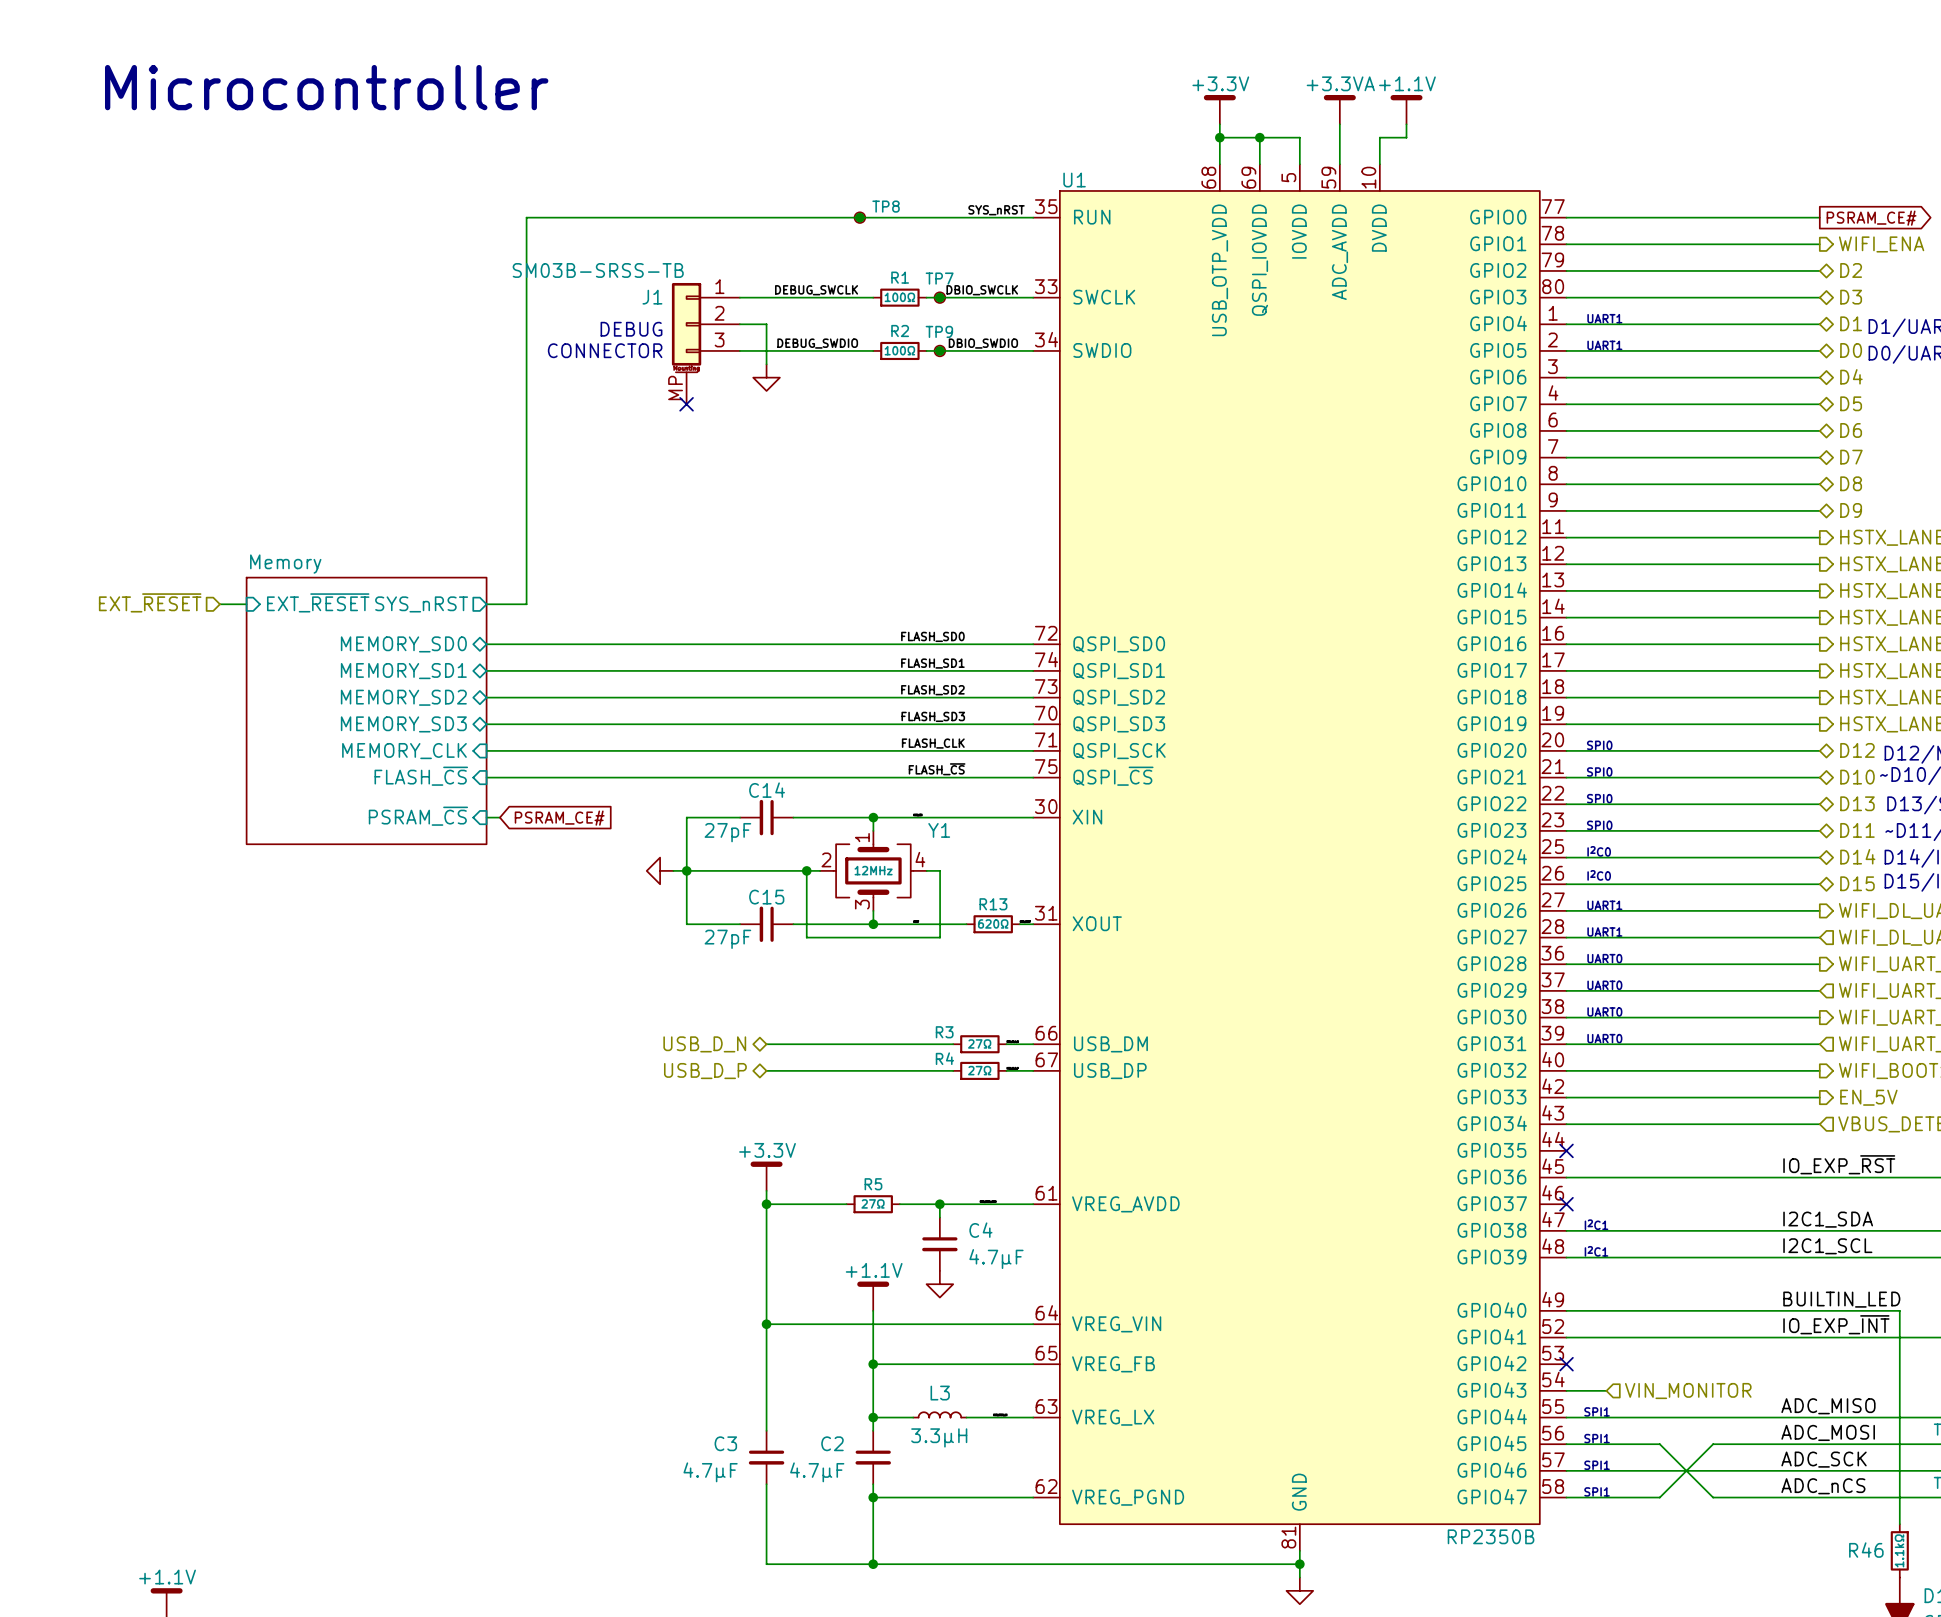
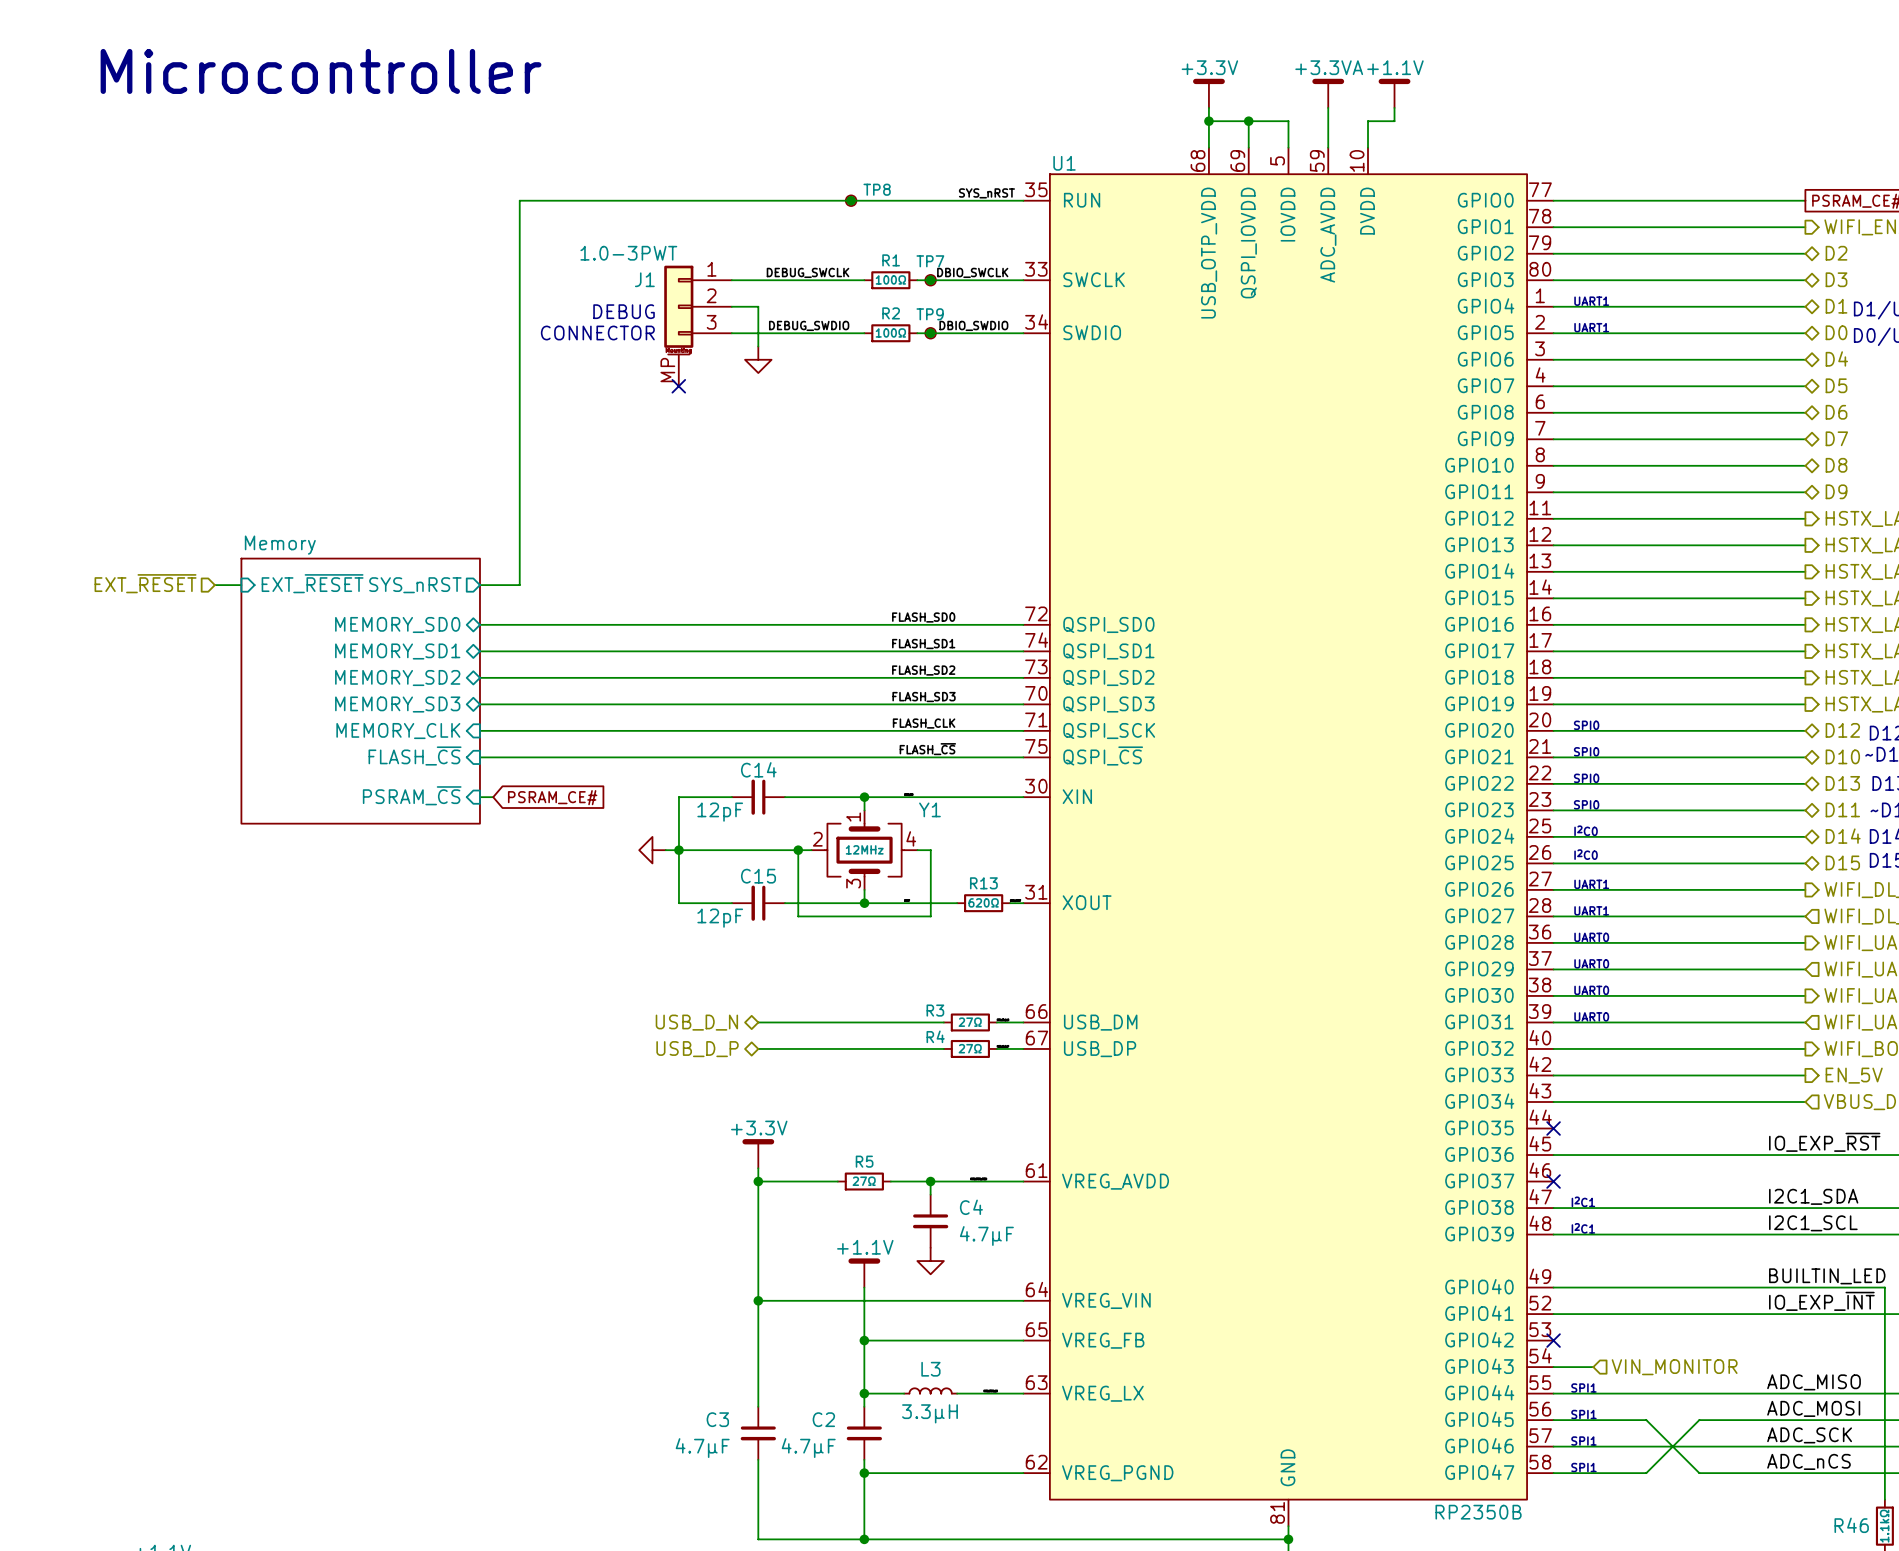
J1 value: SM03B-SRSS-TB (598, 270) -> 1.0-3PWT (628, 253)
C14 value: 27pF (727, 832) -> 12pF (720, 812)
C15 value: 27pF (727, 939) -> 12pF (720, 918)

